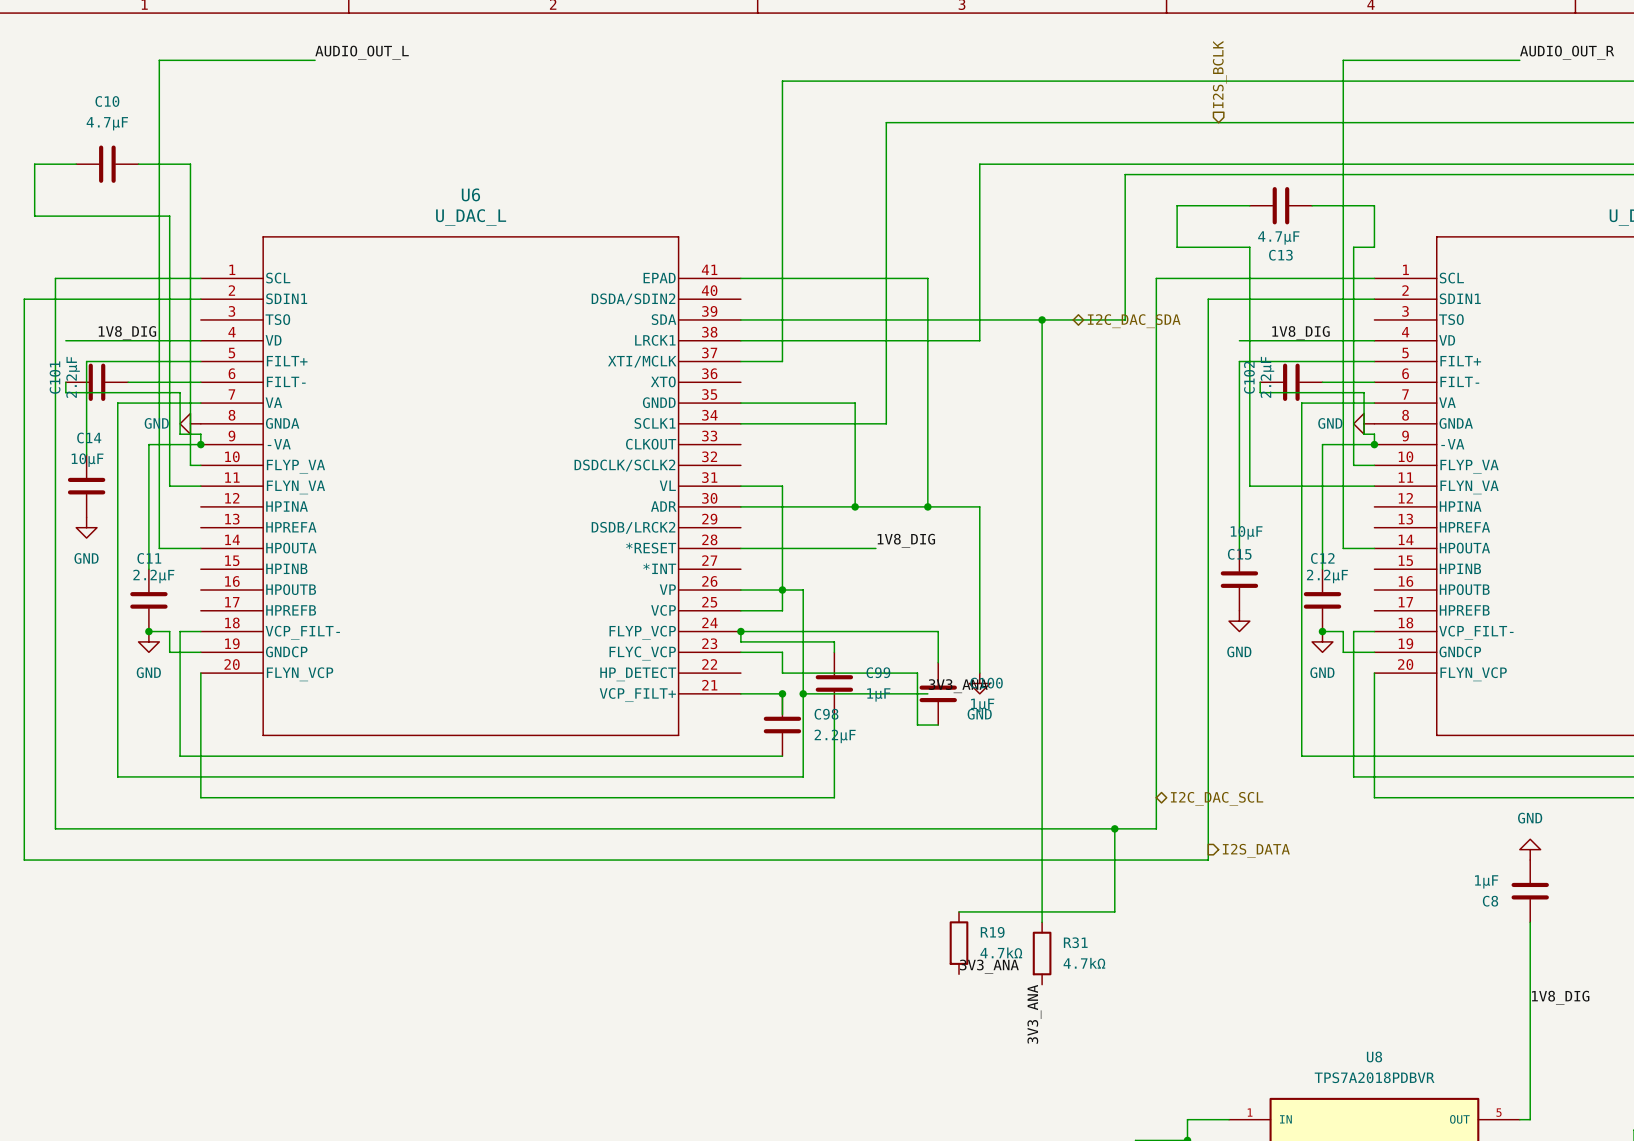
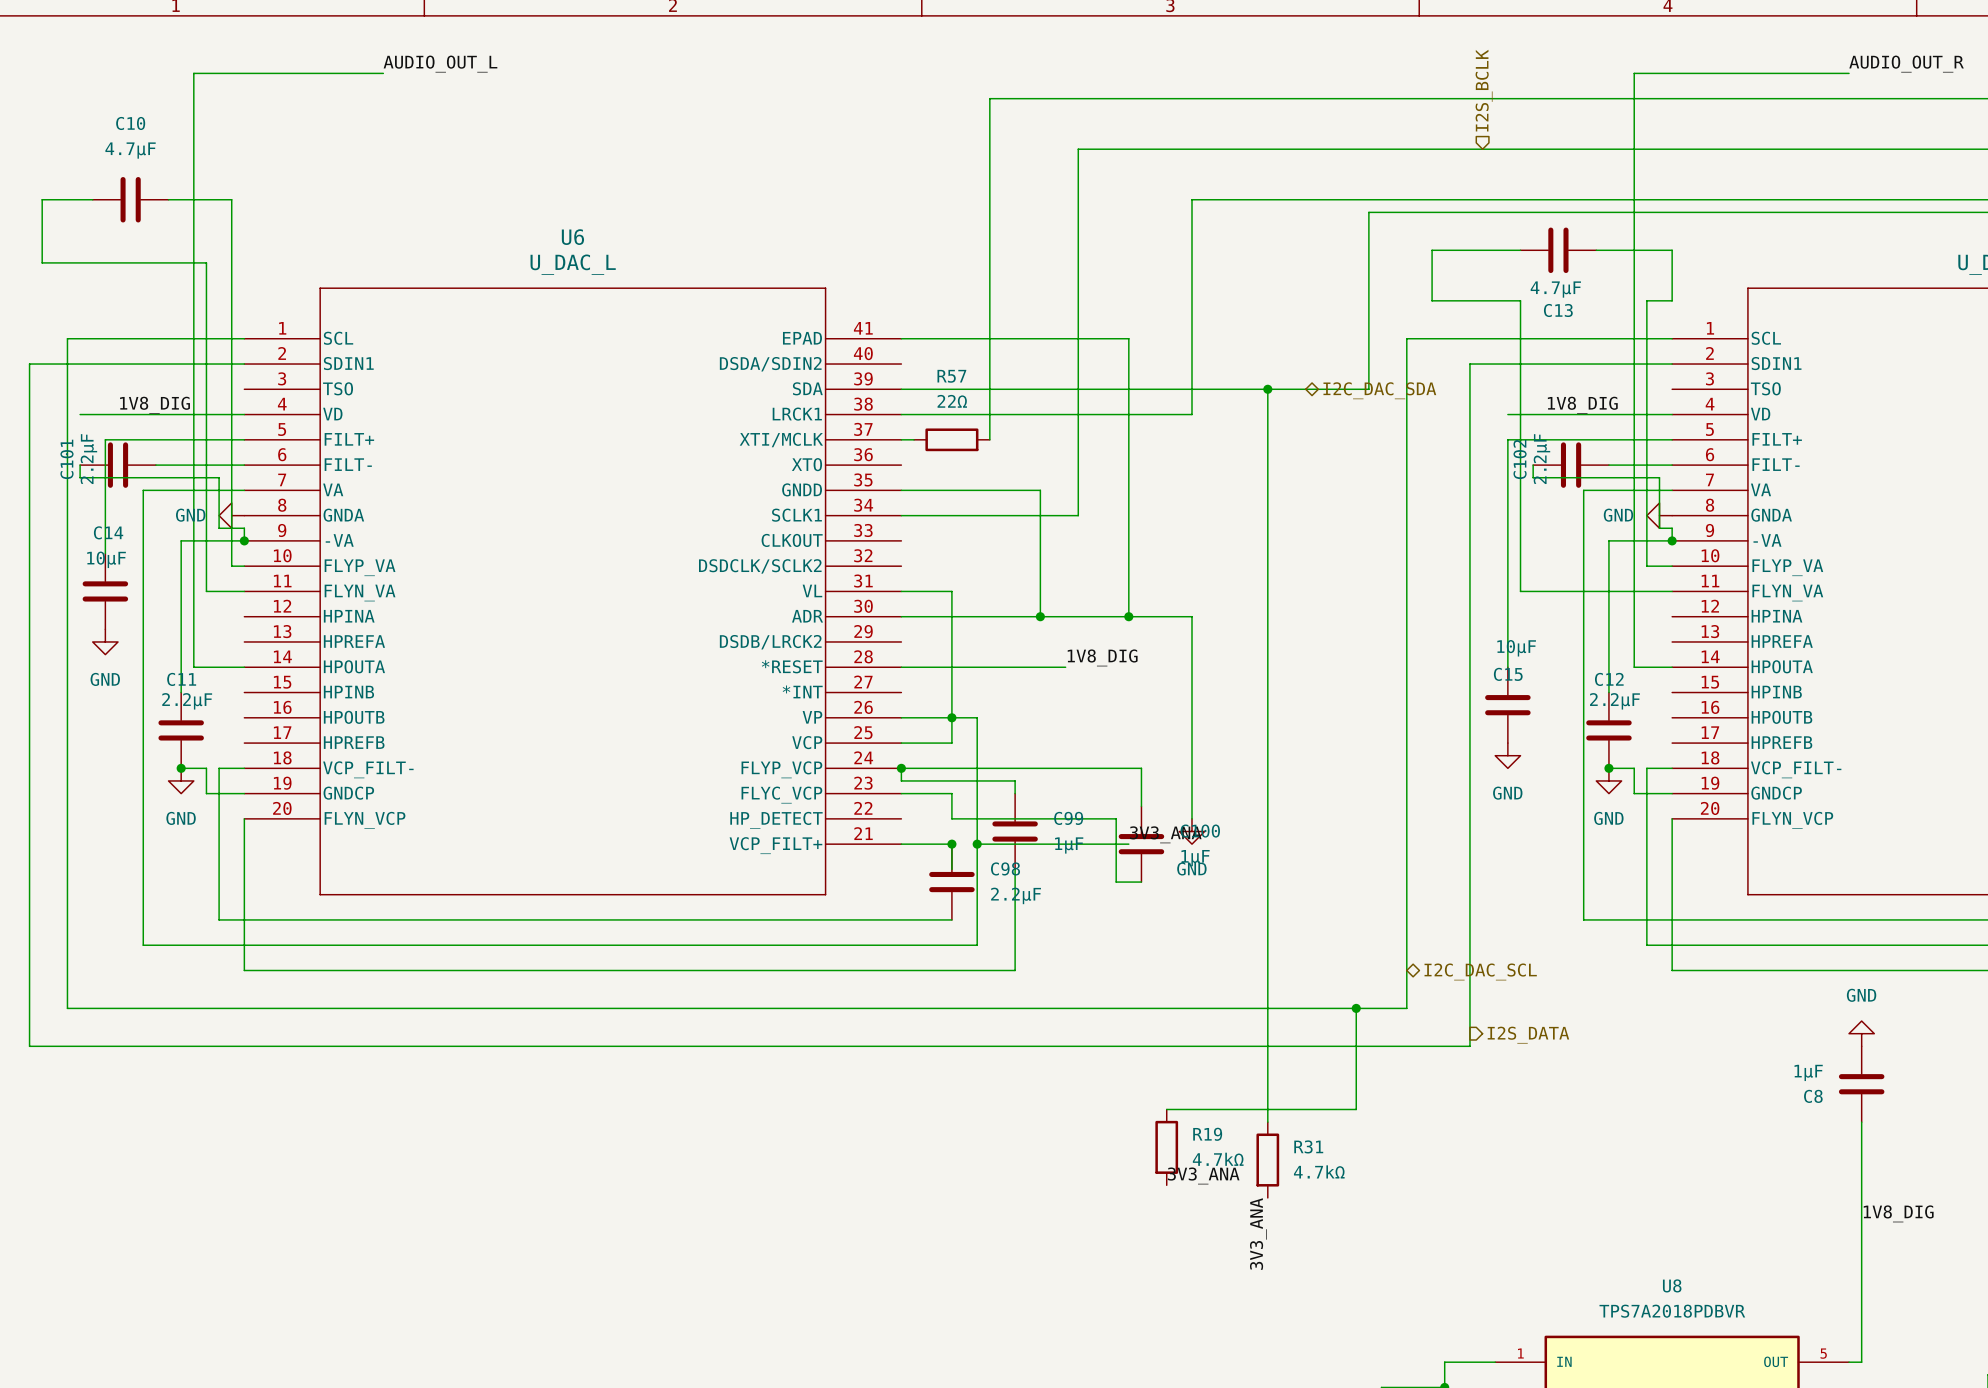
wire: (813, 81) (782, 81) (782, 361) (751, 361) -> (989, 98) (989, 439)
R57: none -> 22Ω (951, 439)

